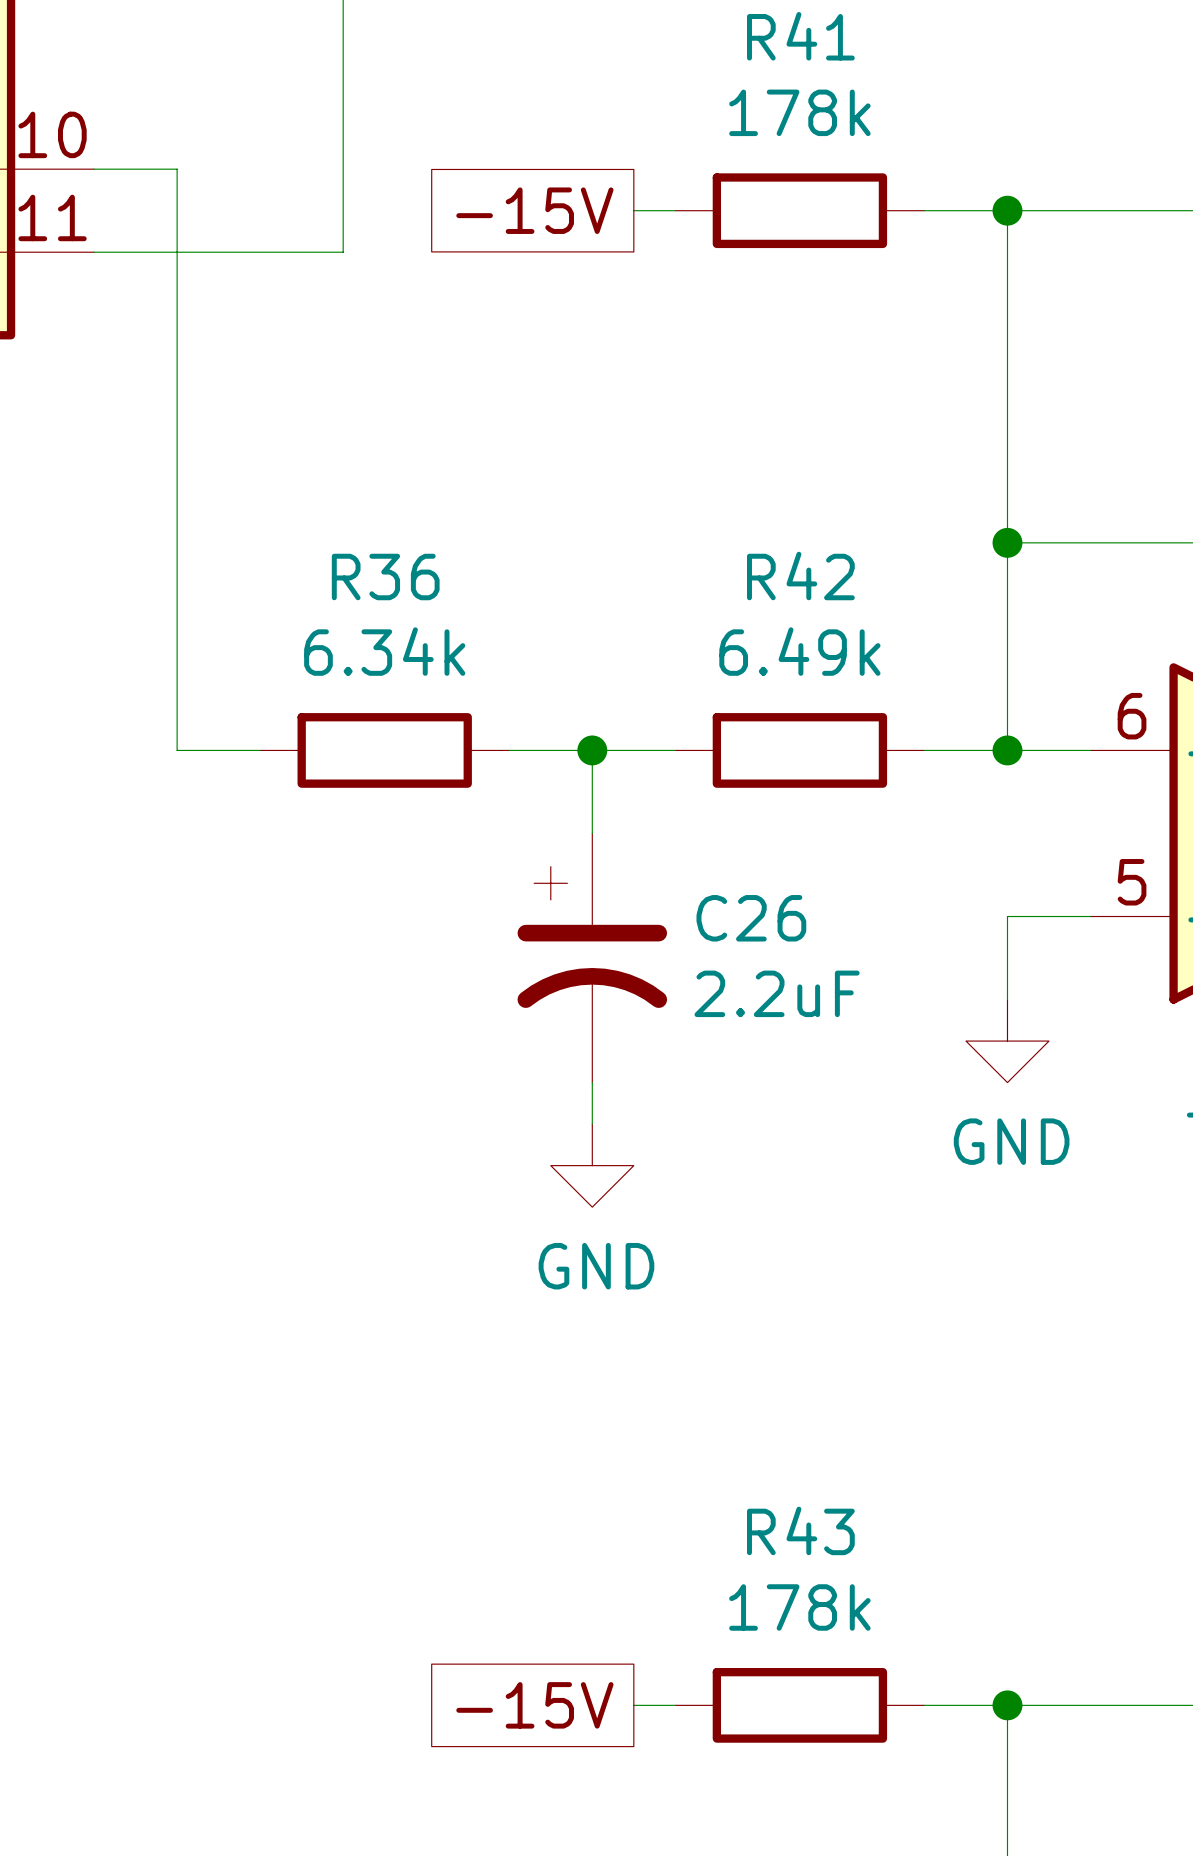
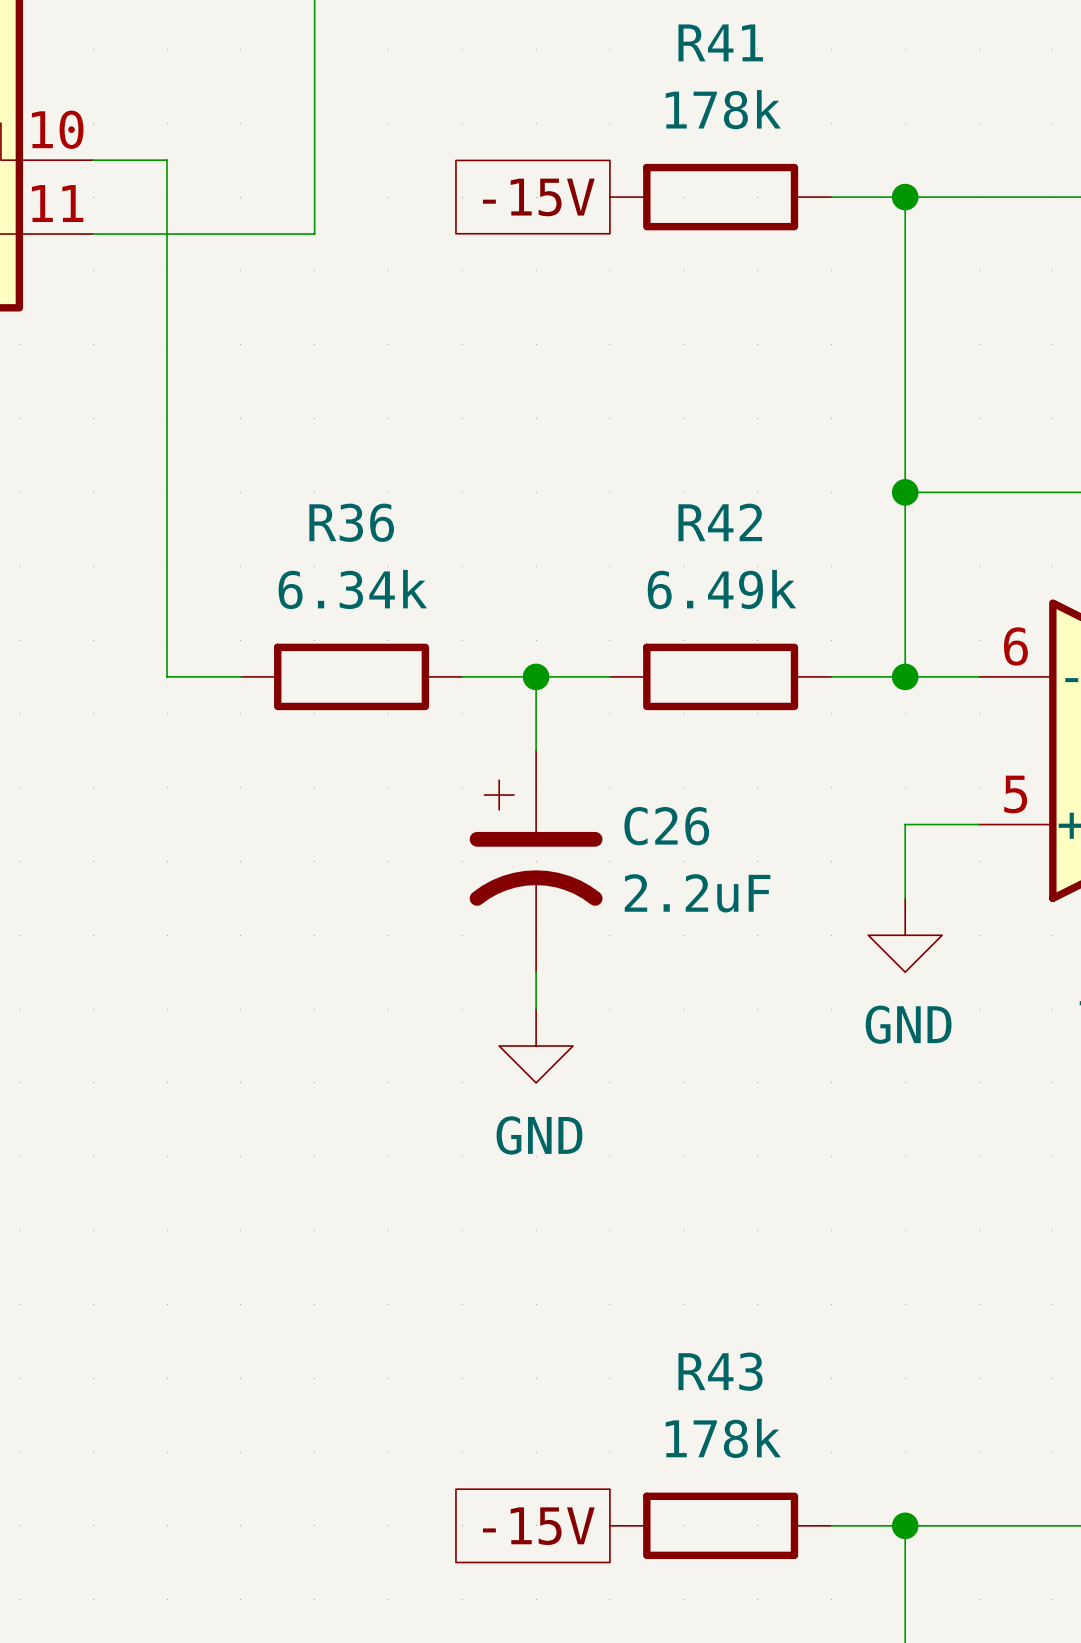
global label position: -15V (534, 210) -> -15V (538, 197)
wire: (633, 210) (675, 210) -> none
global label position: -15V (534, 1705) -> -15V (538, 1526)
wire: (633, 1705) (675, 1705) -> none

